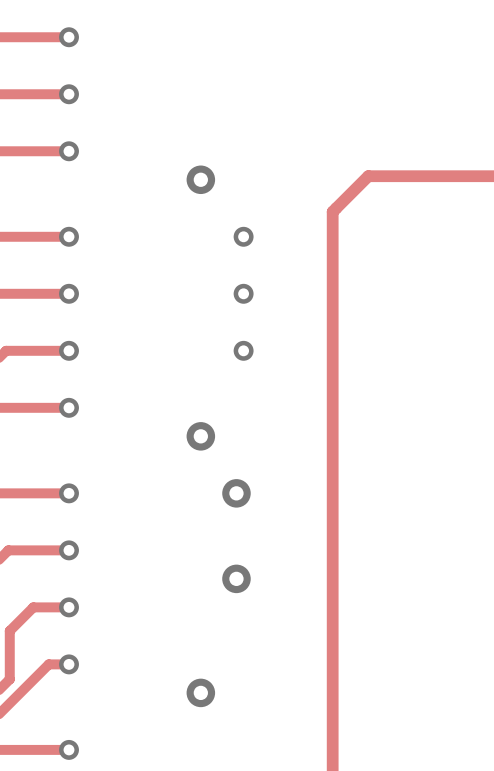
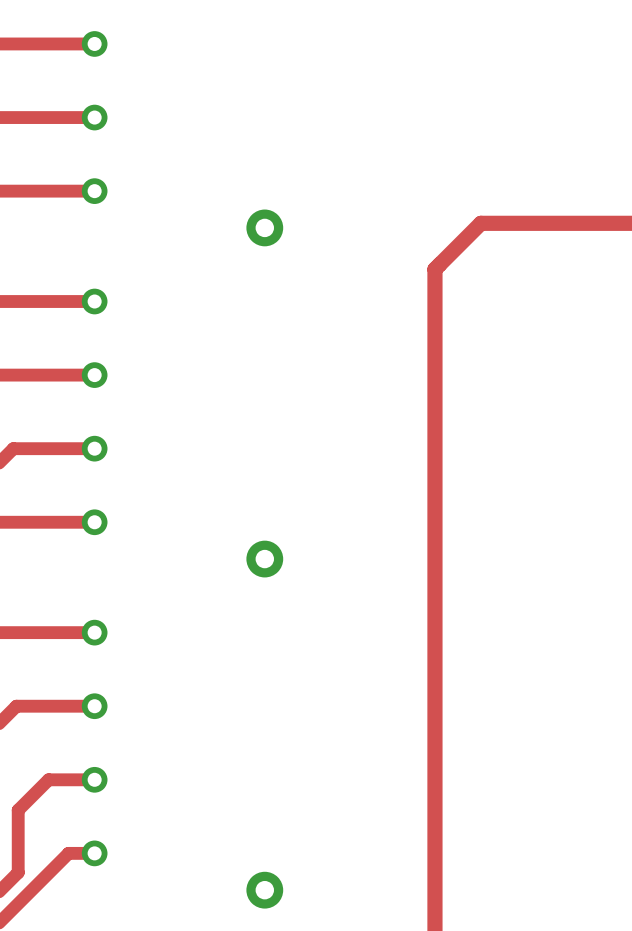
via: (243, 236) -> none
via: (243, 293) -> none
via: (243, 350) -> none
via: (236, 493) -> none
via: (236, 578) -> none

